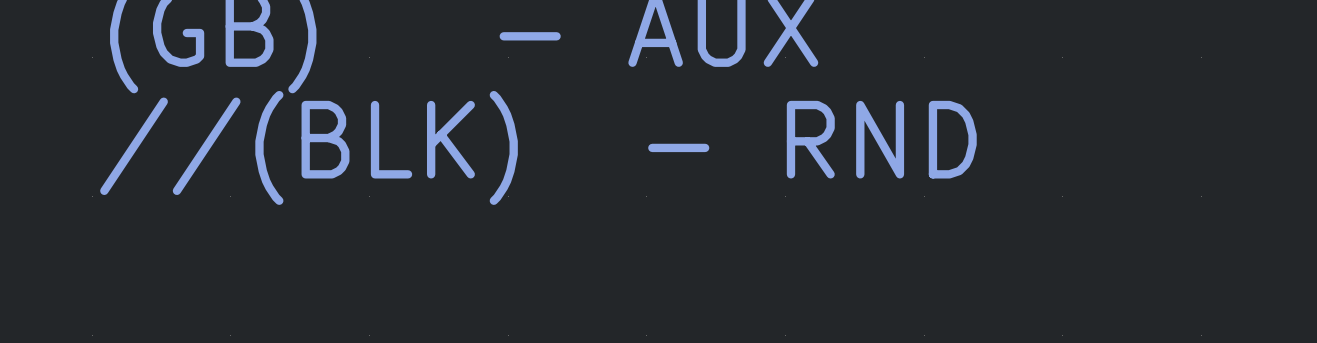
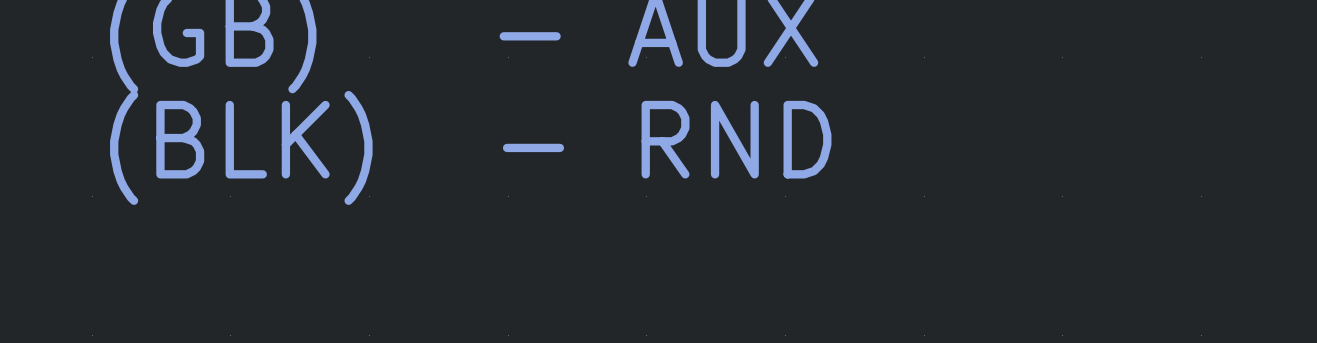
text: //(BLK) - RND (538, 147) -> (BLK) - RND (470, 147)

